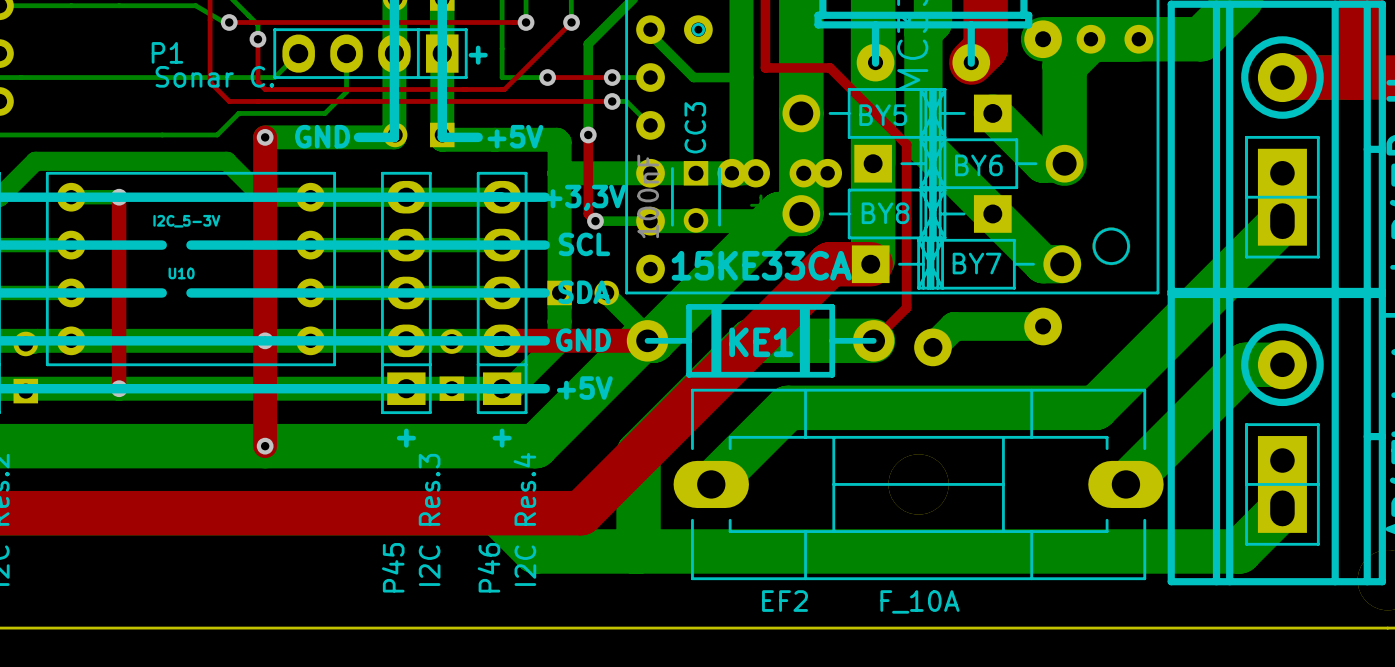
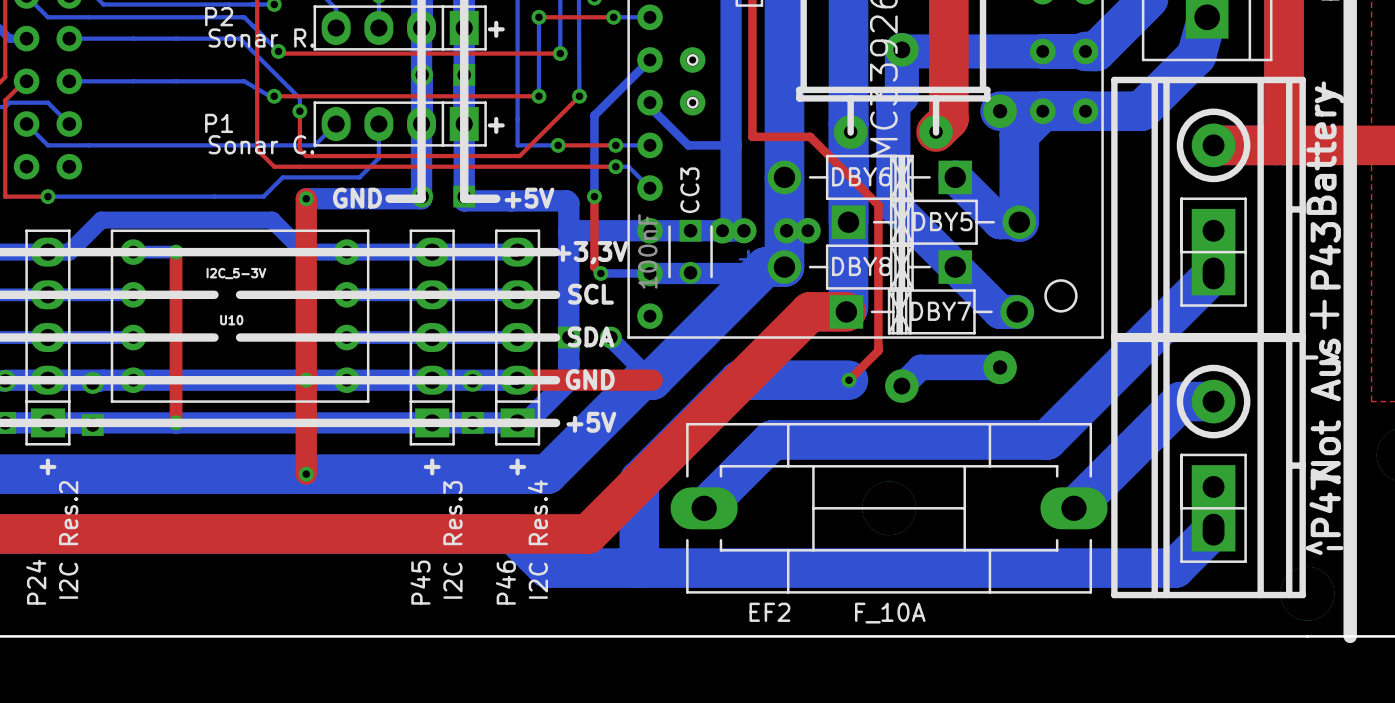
BY6: (897, 113) -> none
DBY6: none -> (869, 177)
BY5: (968, 163) -> none
DBY5: none -> (933, 222)
BY8: (897, 213) -> none
DBY8: none -> (869, 267)
BY7: (966, 264) -> none
DBY7: none -> (931, 311)
KE1: 15KE33CA (760, 340) -> none

